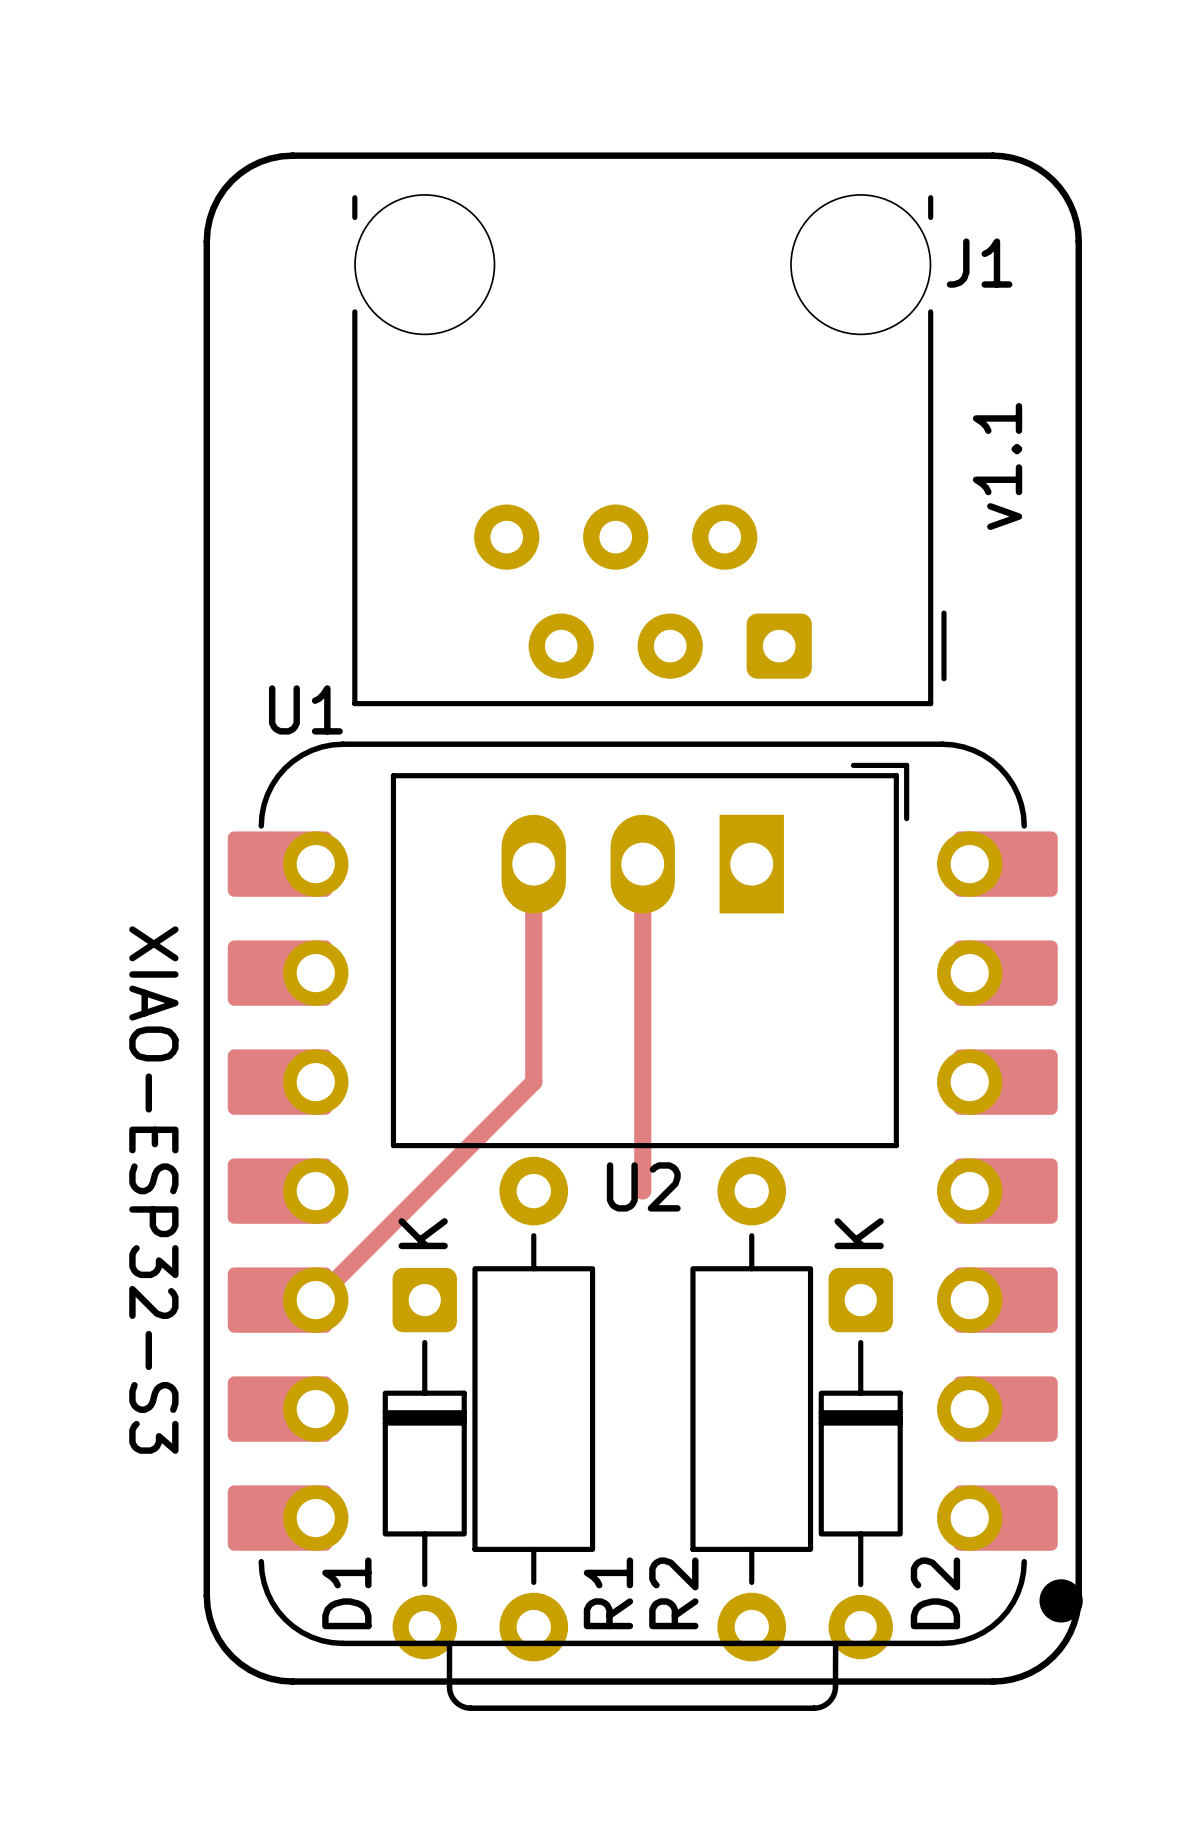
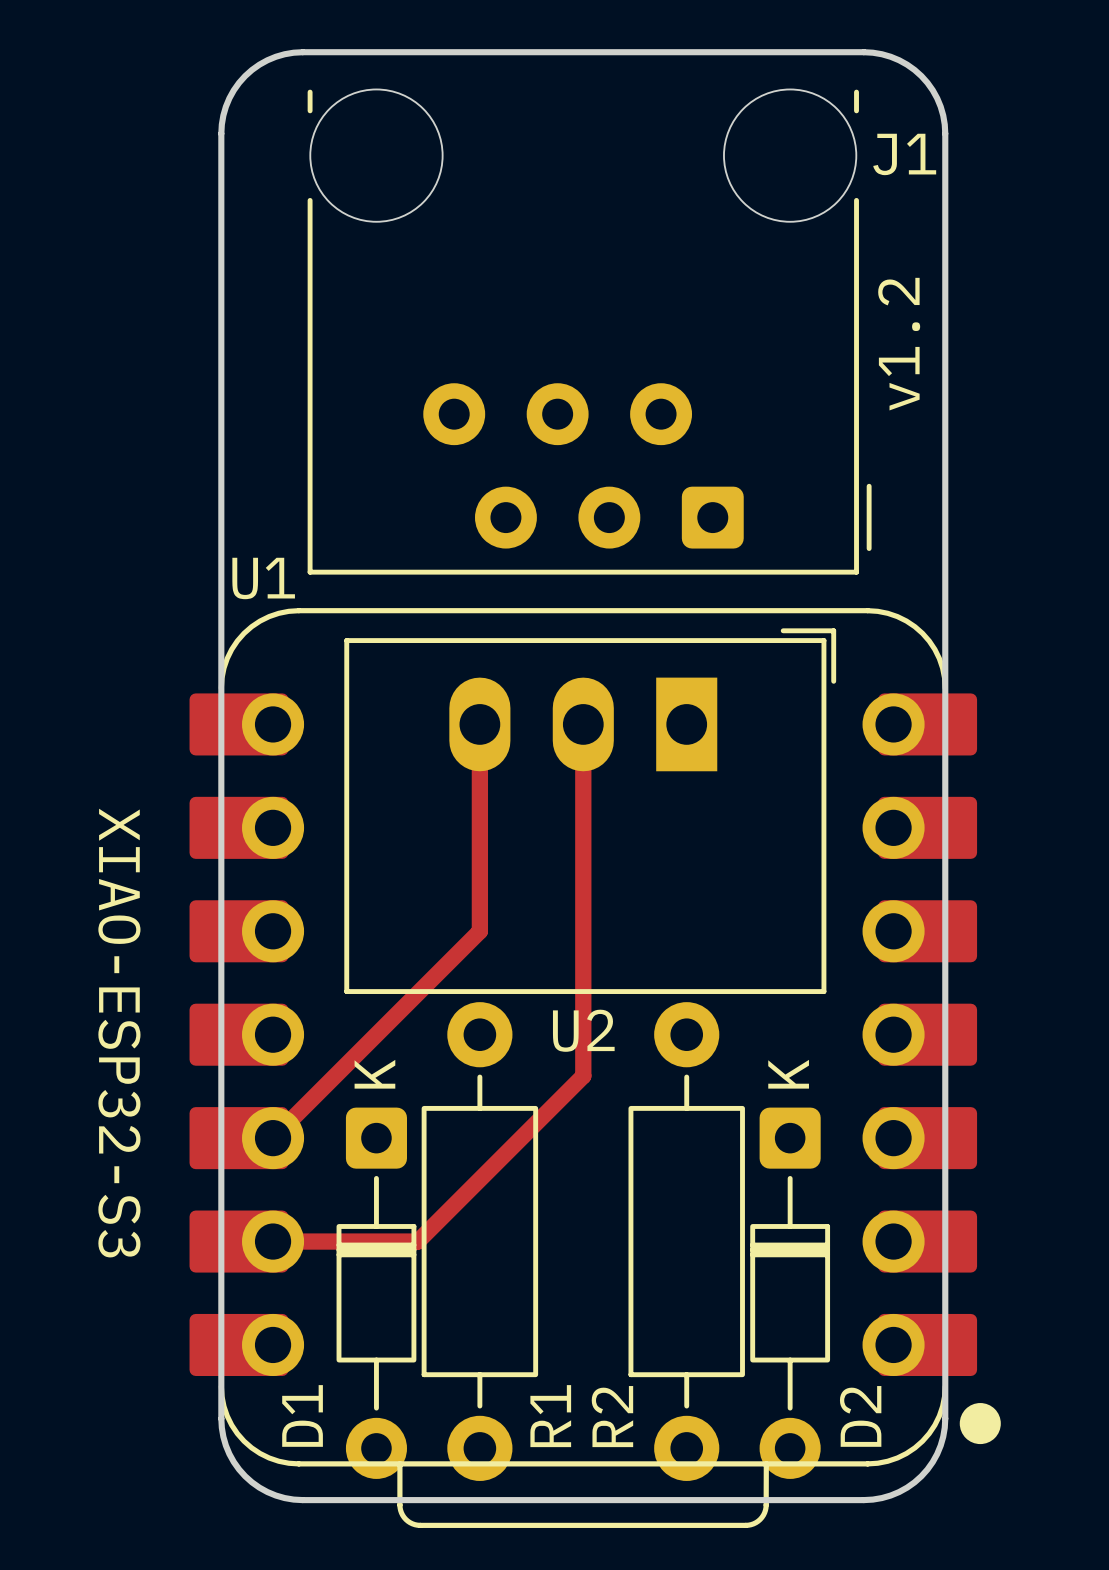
board edge: (347, 155) (281, 156) (249, 167) (231, 180) (218, 198) (209, 219) (206, 241) (207, 1606) (213, 1628) (224, 1647) (249, 1670) (281, 1680) (347, 1681) -> (302, 52) (284, 54) (267, 60) (245, 76) (233, 90) (225, 106) (221, 133) (221, 1427) (229, 1454) (245, 1476) (259, 1487) (275, 1495) (302, 1500)
board edge: (938, 155) (1002, 156) (1021, 160) (1038, 168) (1053, 180) (1065, 195) (1073, 213) (1078, 241) (1078, 1605) (1073, 1624) (1065, 1641) (1046, 1662) (1030, 1673) (1002, 1681) (938, 1681) -> (863, 52) (890, 56) (907, 64) (921, 76) (932, 90) (940, 106) (945, 133) (944, 1427) (937, 1454) (927, 1469) (914, 1482) (890, 1495) (863, 1500)
text: v1.1 (997, 466) -> v1.2 (899, 344)
track: none -> (583, 1034) (583, 1076) (417, 1241) (273, 1241)

